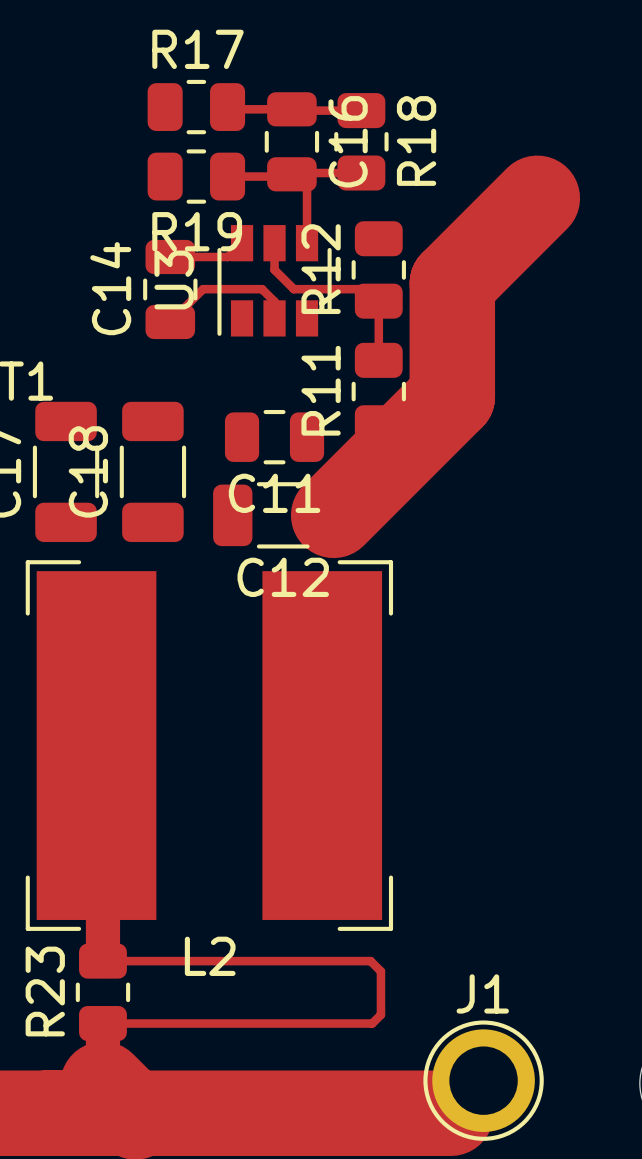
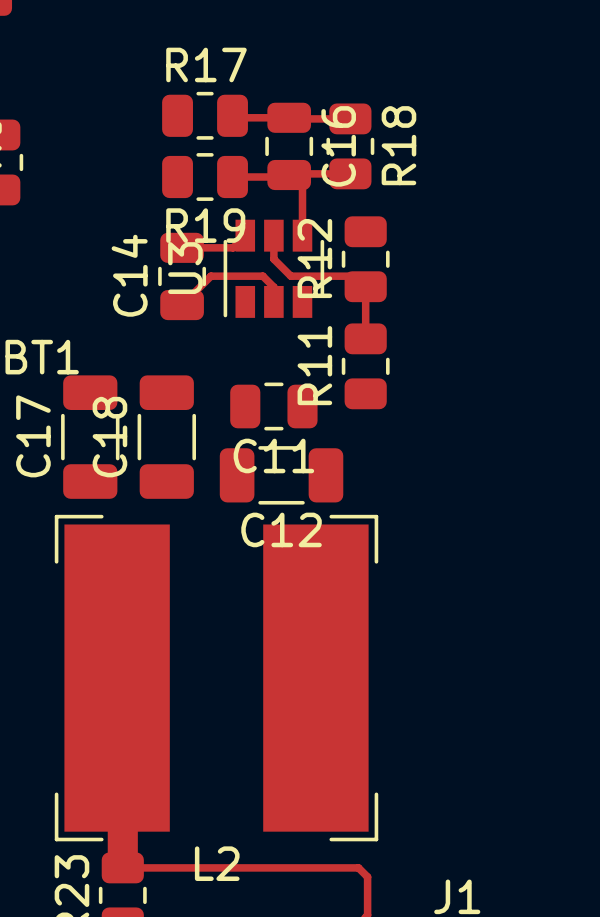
top track: (537, 198) (452, 283) (452, 396) (333, 515) -> none

